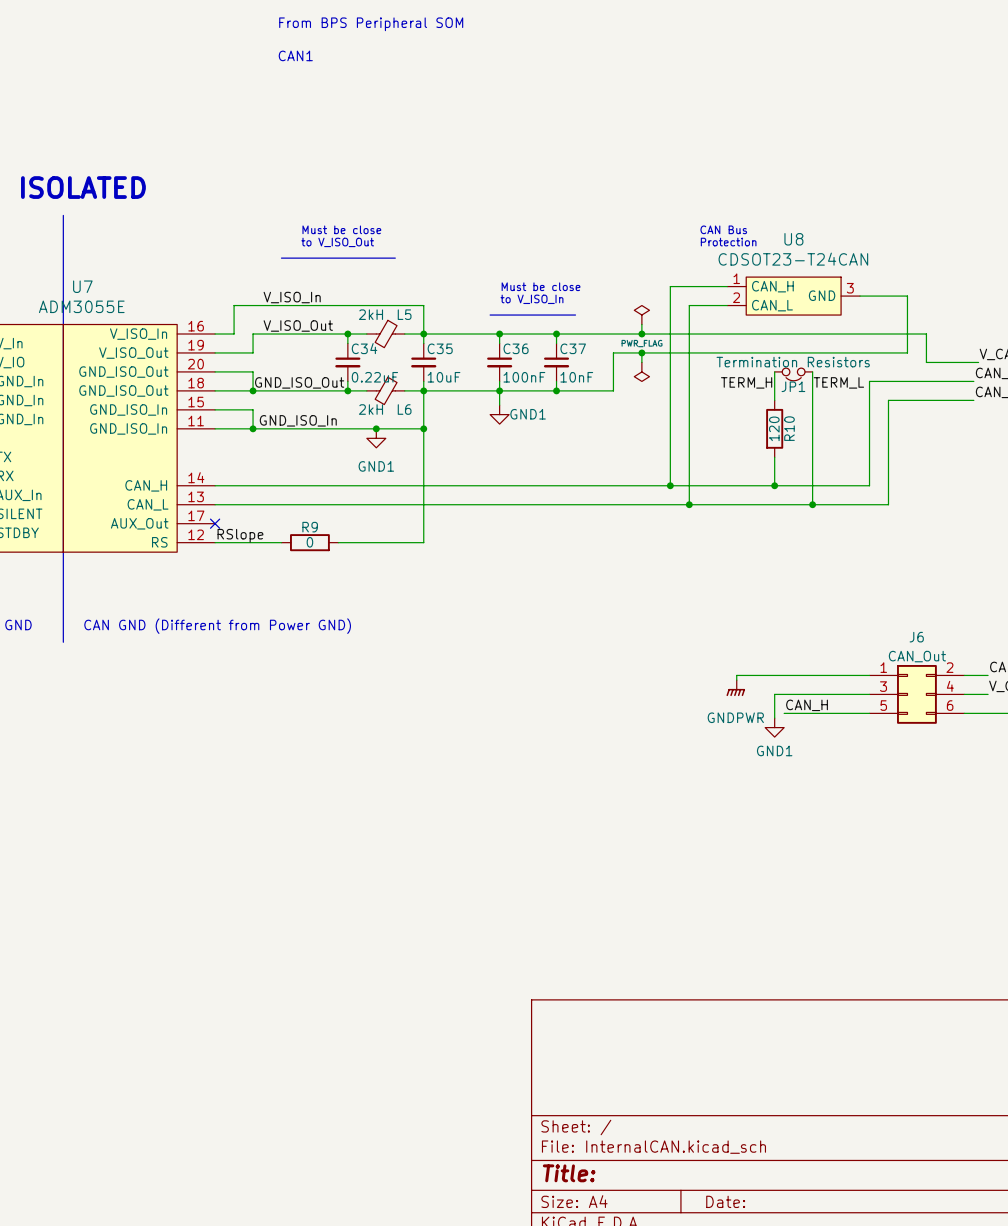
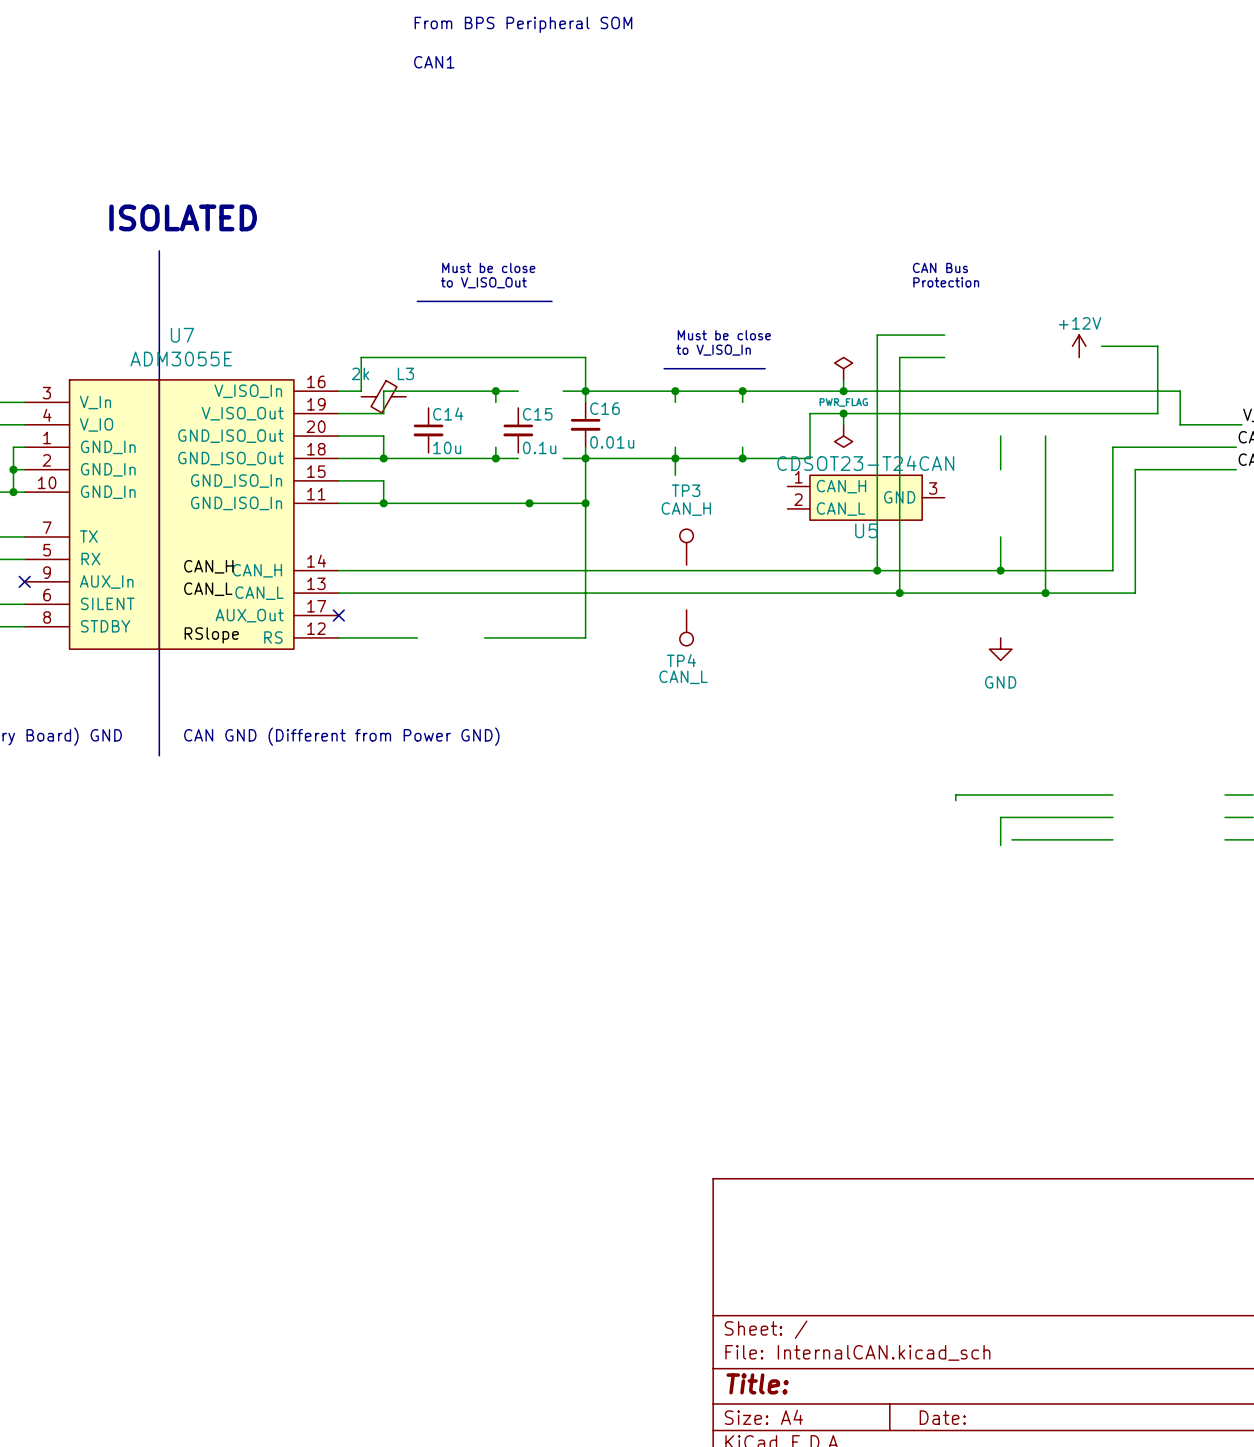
U8: CDSOT23-T24CAN (793, 296) -> none
power symbol: none -> +12V (1079, 346)
label: V_ISO_In (292, 297) -> none
label: V_ISO_Out (298, 325) -> none
L5: 2kH (385, 334) -> none
L3: none -> 2k (383, 396)
C35 name: C35 (440, 348) -> C16 (605, 408)
C34: 0.22uF (347, 362) -> none
C36: 100nF (499, 362) -> none
C37: 10nF (556, 362) -> none
C14: none -> 10u (428, 430)
C15: none -> 0.1u (518, 430)
JP1: Termination Resistors (793, 374) -> none
C35 value: 10uF (444, 377) -> 0.01u (612, 442)
label: GND_ISO_Out (299, 382) -> none
label: TERM_H (746, 382) -> none
label: TERM_L (838, 382) -> none
L6: 2kH (385, 390) -> none
power symbol: GND1 (499, 414) -> none
label: GND_ISO_In (298, 420) -> none
U5: none -> CDSOT23-T24CAN (866, 497)
R10: 120 (774, 428) -> none
power symbol: GND1 (376, 438) -> none
TP3: none -> CAN_H (686, 547)
label: none -> CAN_H (208, 566)
label: none -> CAN_L (208, 589)
TP4: none -> CAN_L (686, 627)
label position: RSlope (240, 535) -> RSlope (211, 635)
R9: 0 (309, 542) -> none
power symbol: none -> GND (1000, 649)
power symbol: GNDPWR (735, 688) -> none
J6: CAN_Out (916, 694) -> none
label: CAN_H (807, 705) -> none
power symbol: GND1 (774, 727) -> none

